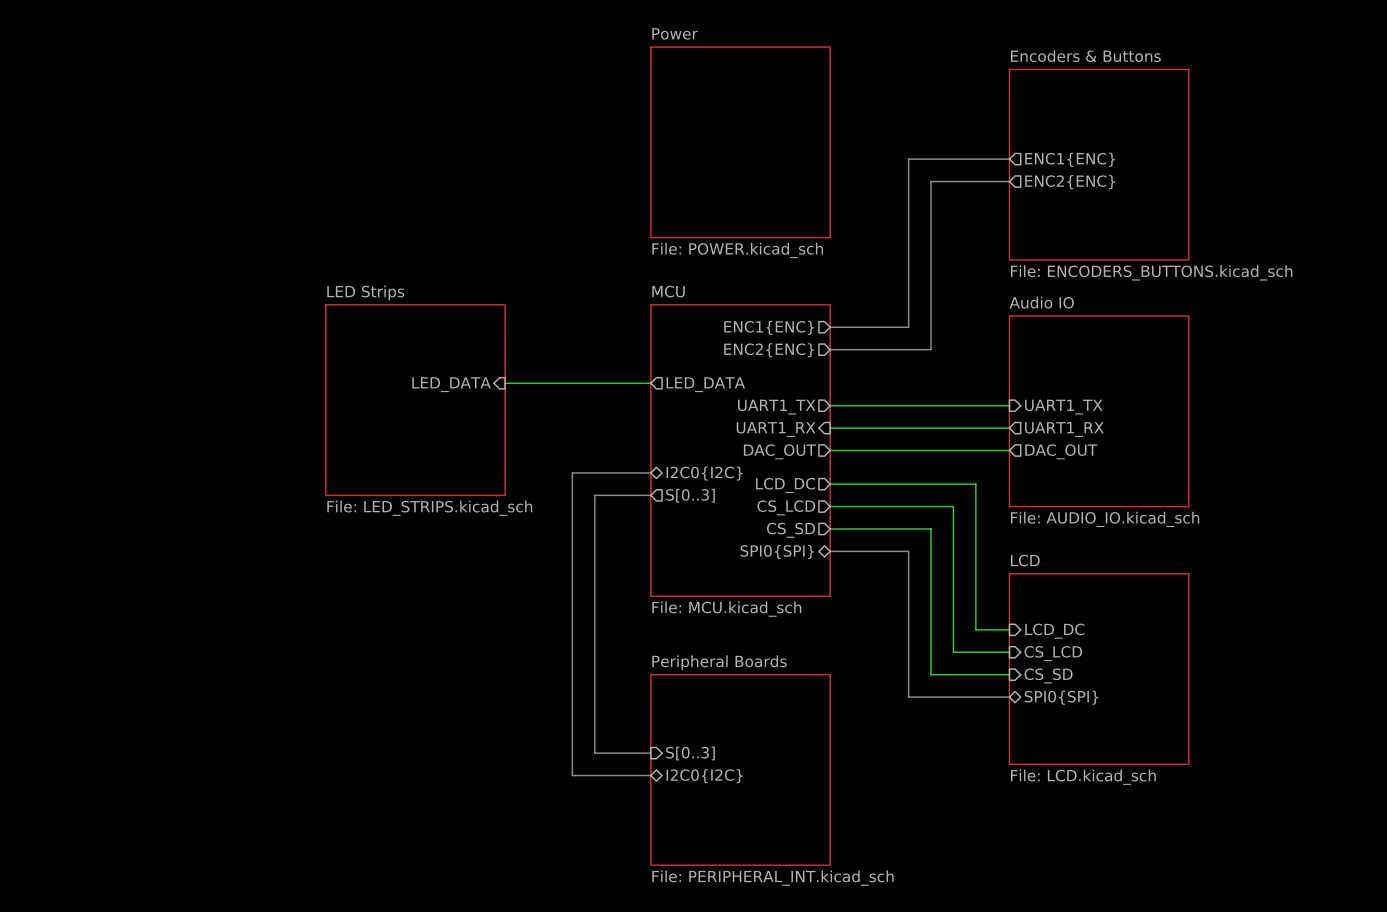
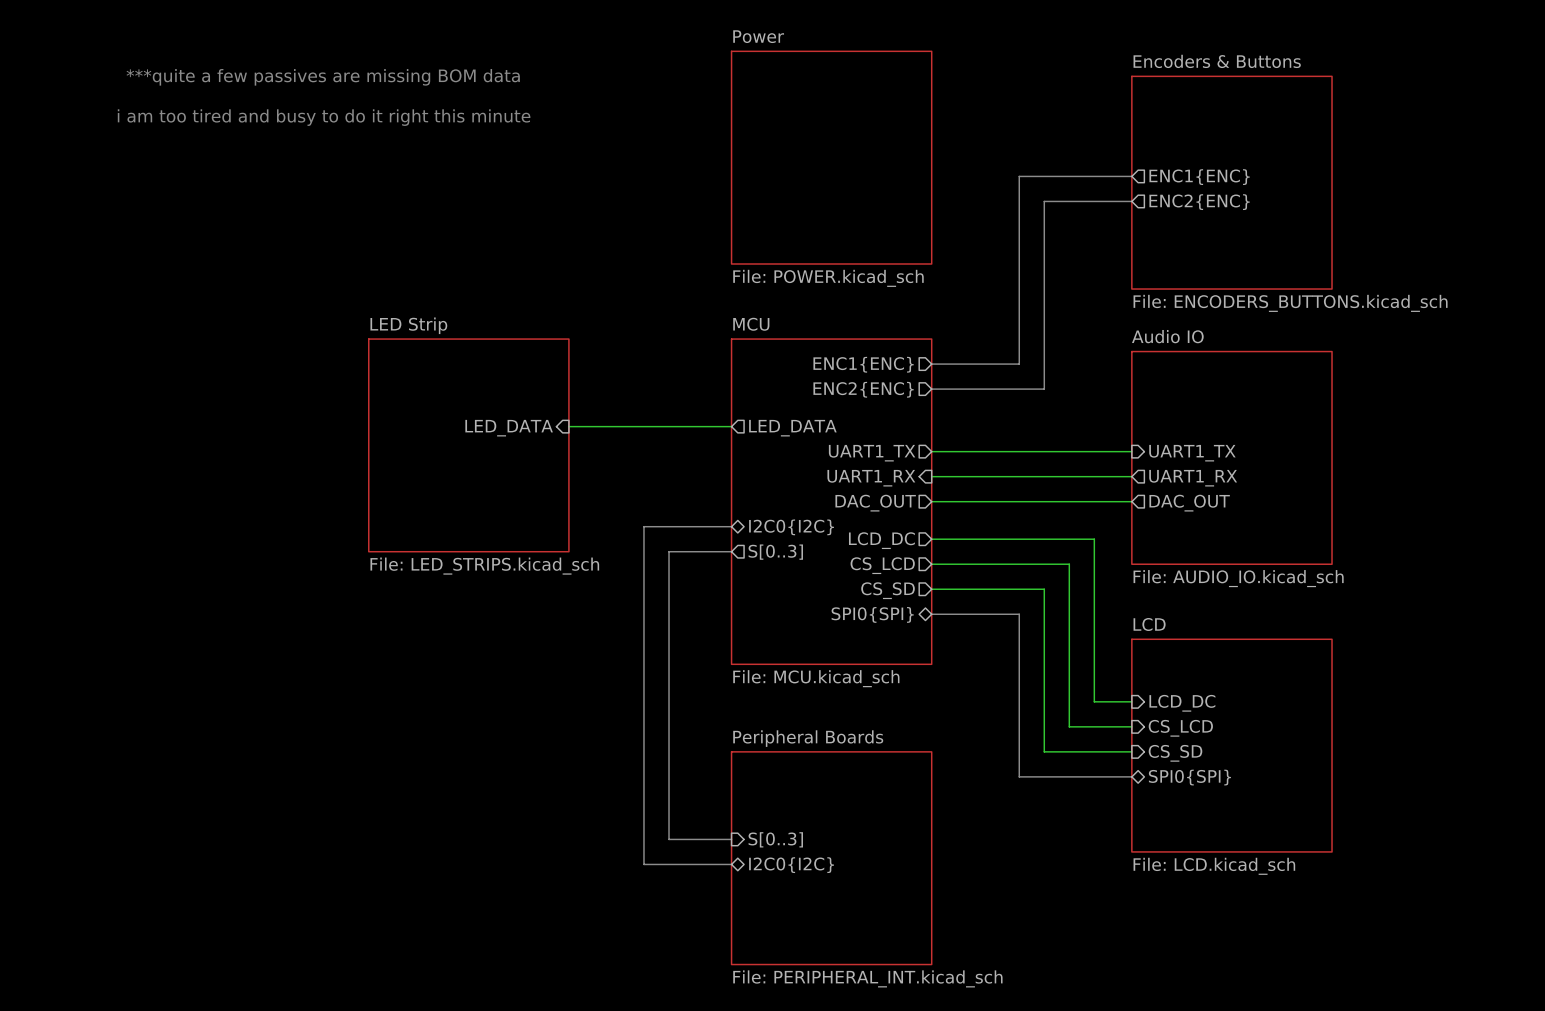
text: none -> ***quite a few passives are missing BOM data (323, 77)
text: none -> i am too tired and busy to do it right this minute (324, 117)
sheet LED Strips name: LED Strips (365, 292) -> LED Strip (408, 325)

